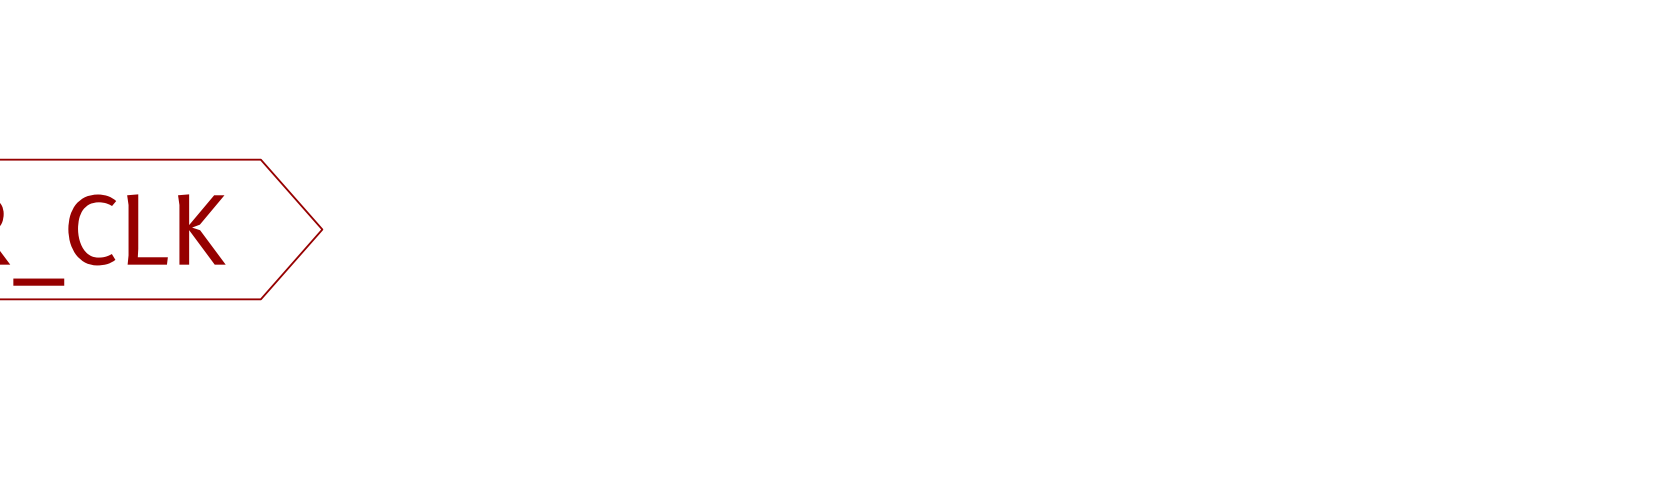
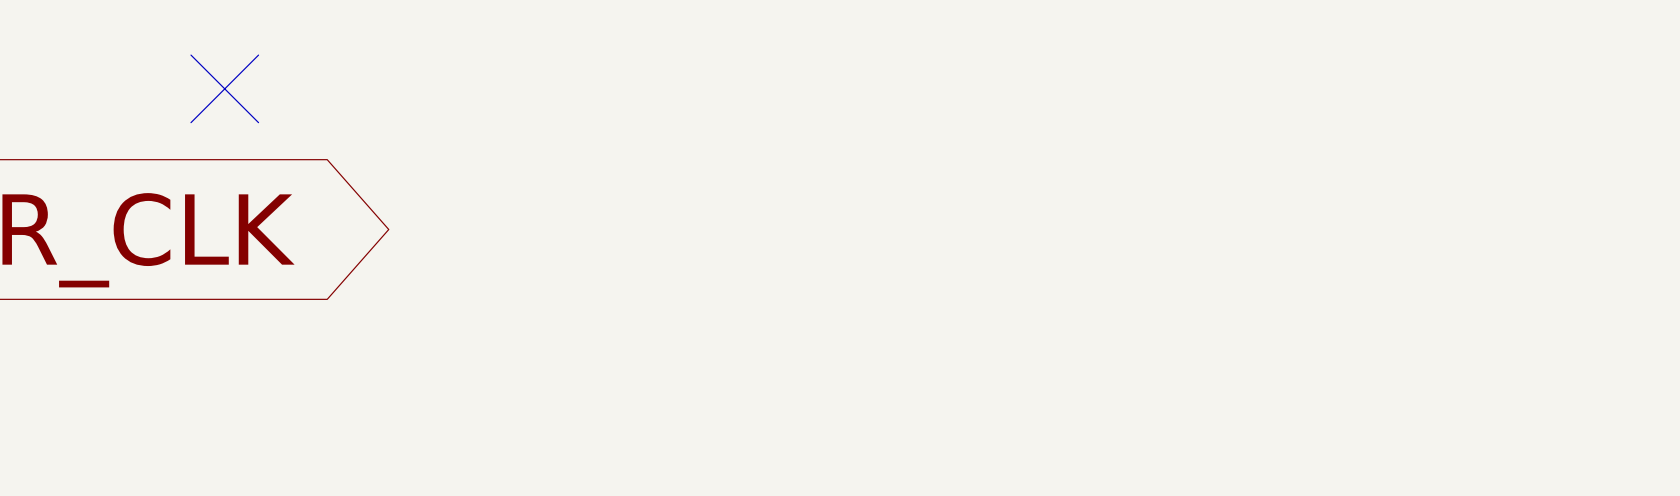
no-connect mark: none -> (224, 88)

